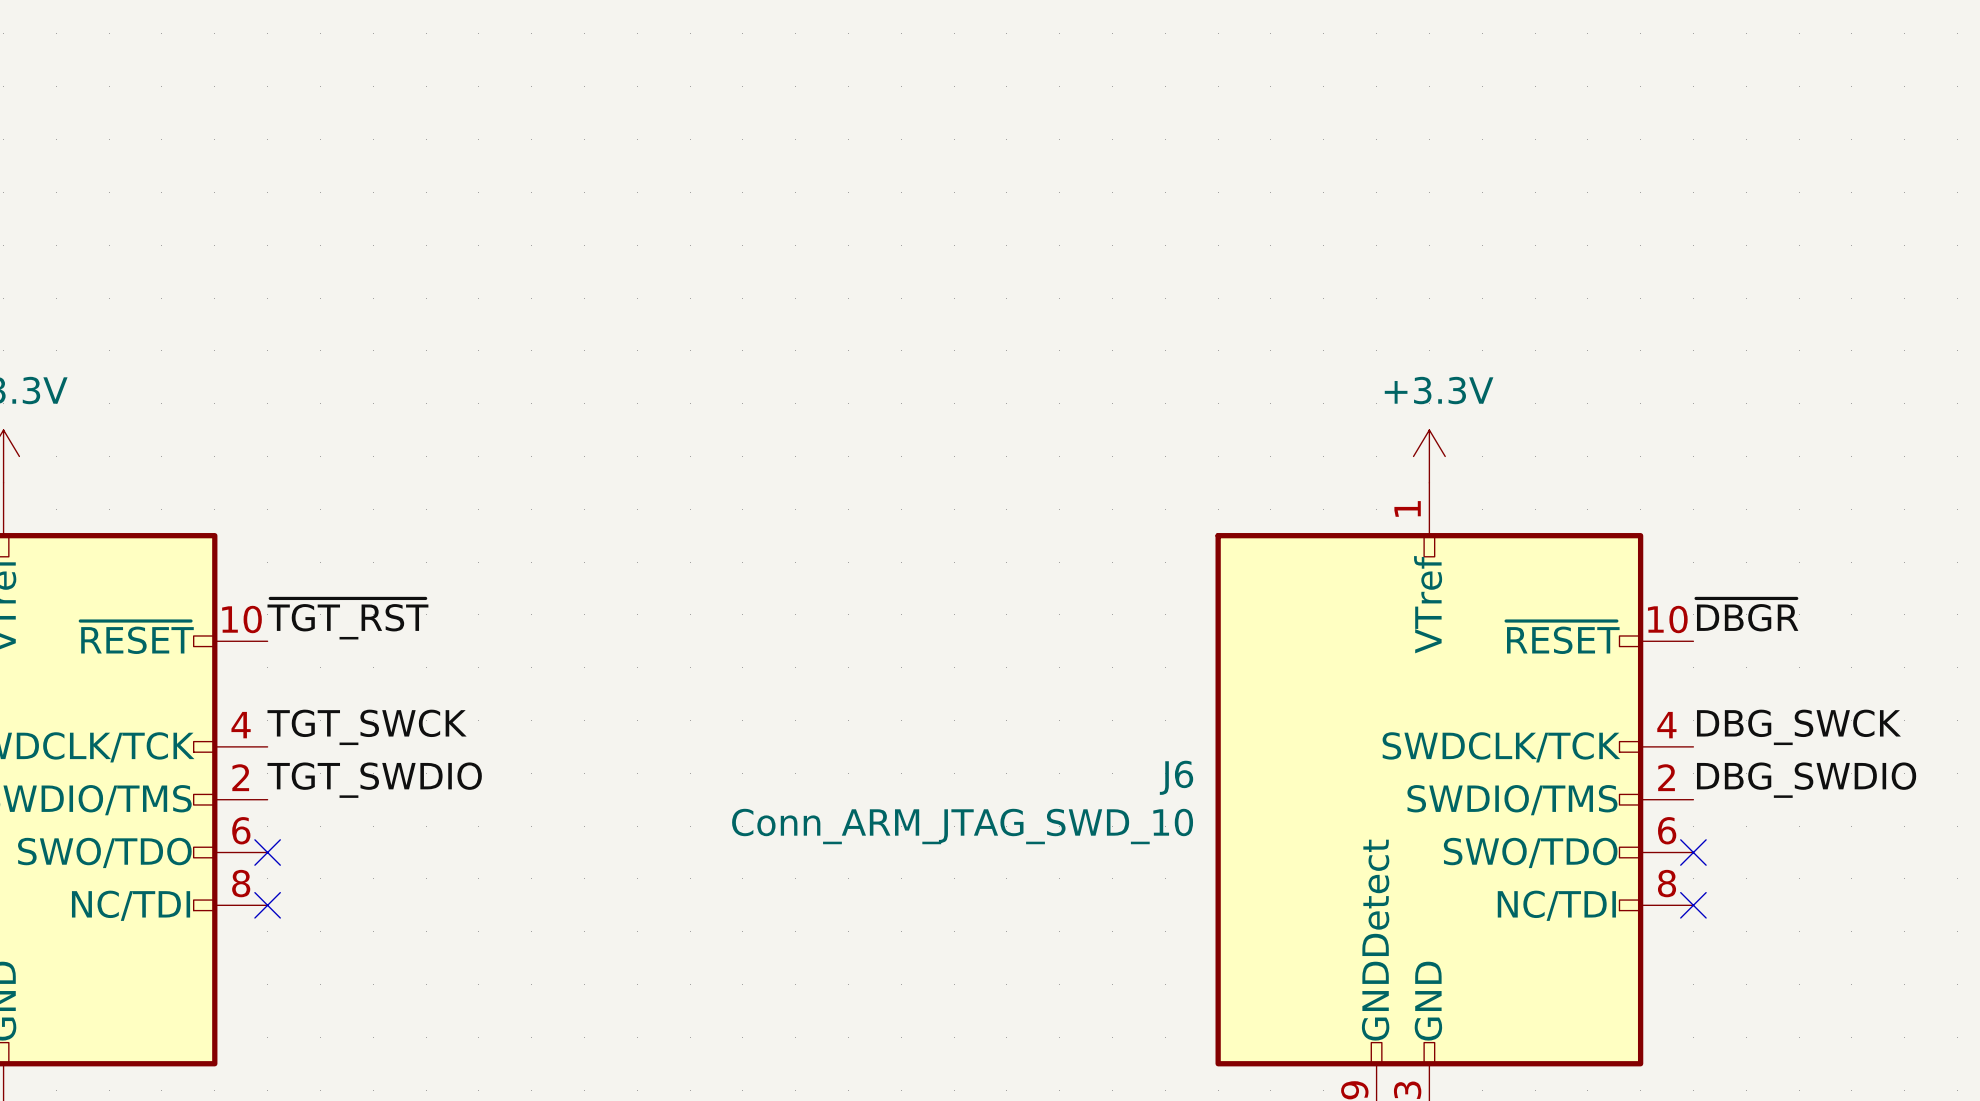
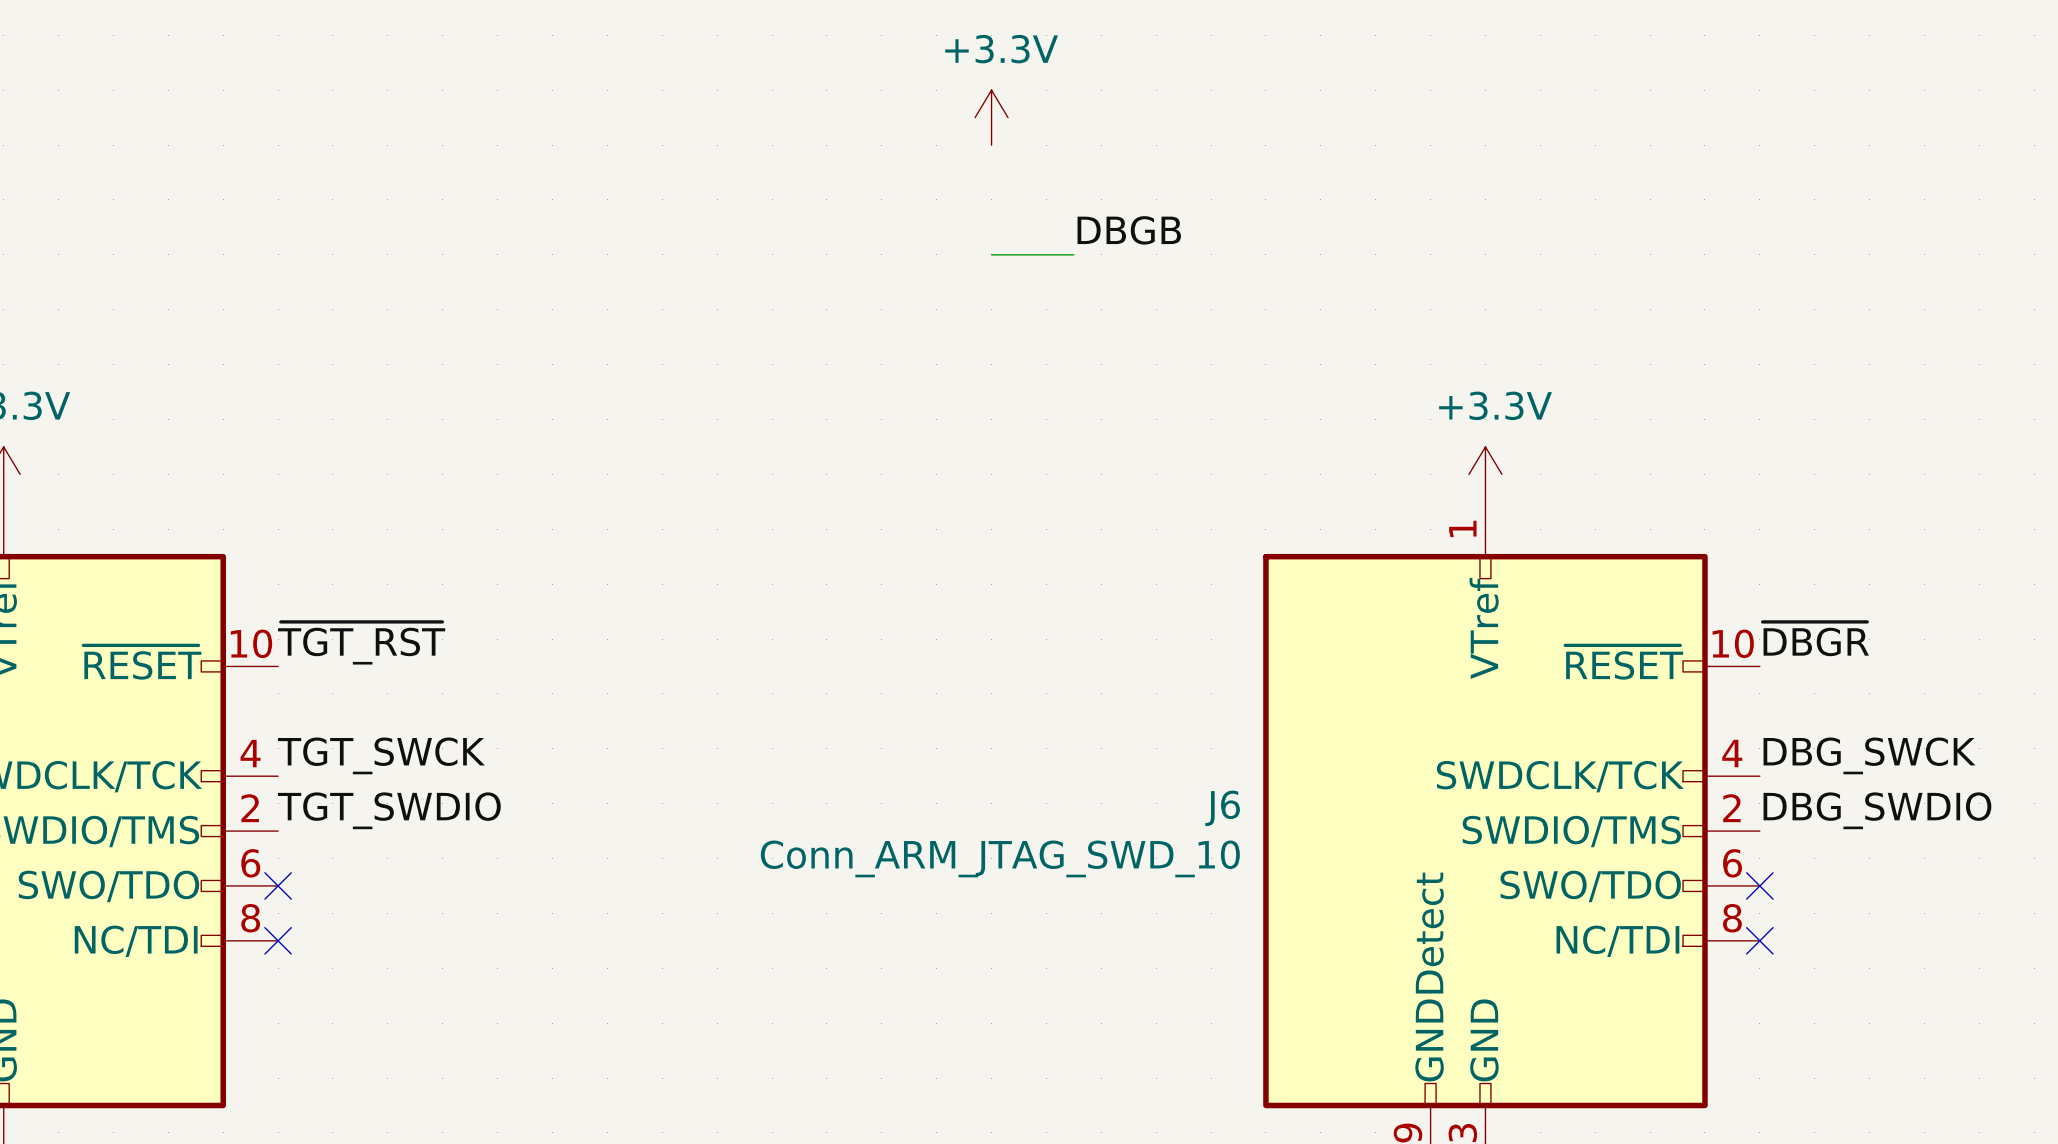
power symbol: none -> +3.3V (991, 117)
label: none -> DBGB (1129, 230)
wire: none -> (991, 254) (1073, 254)

